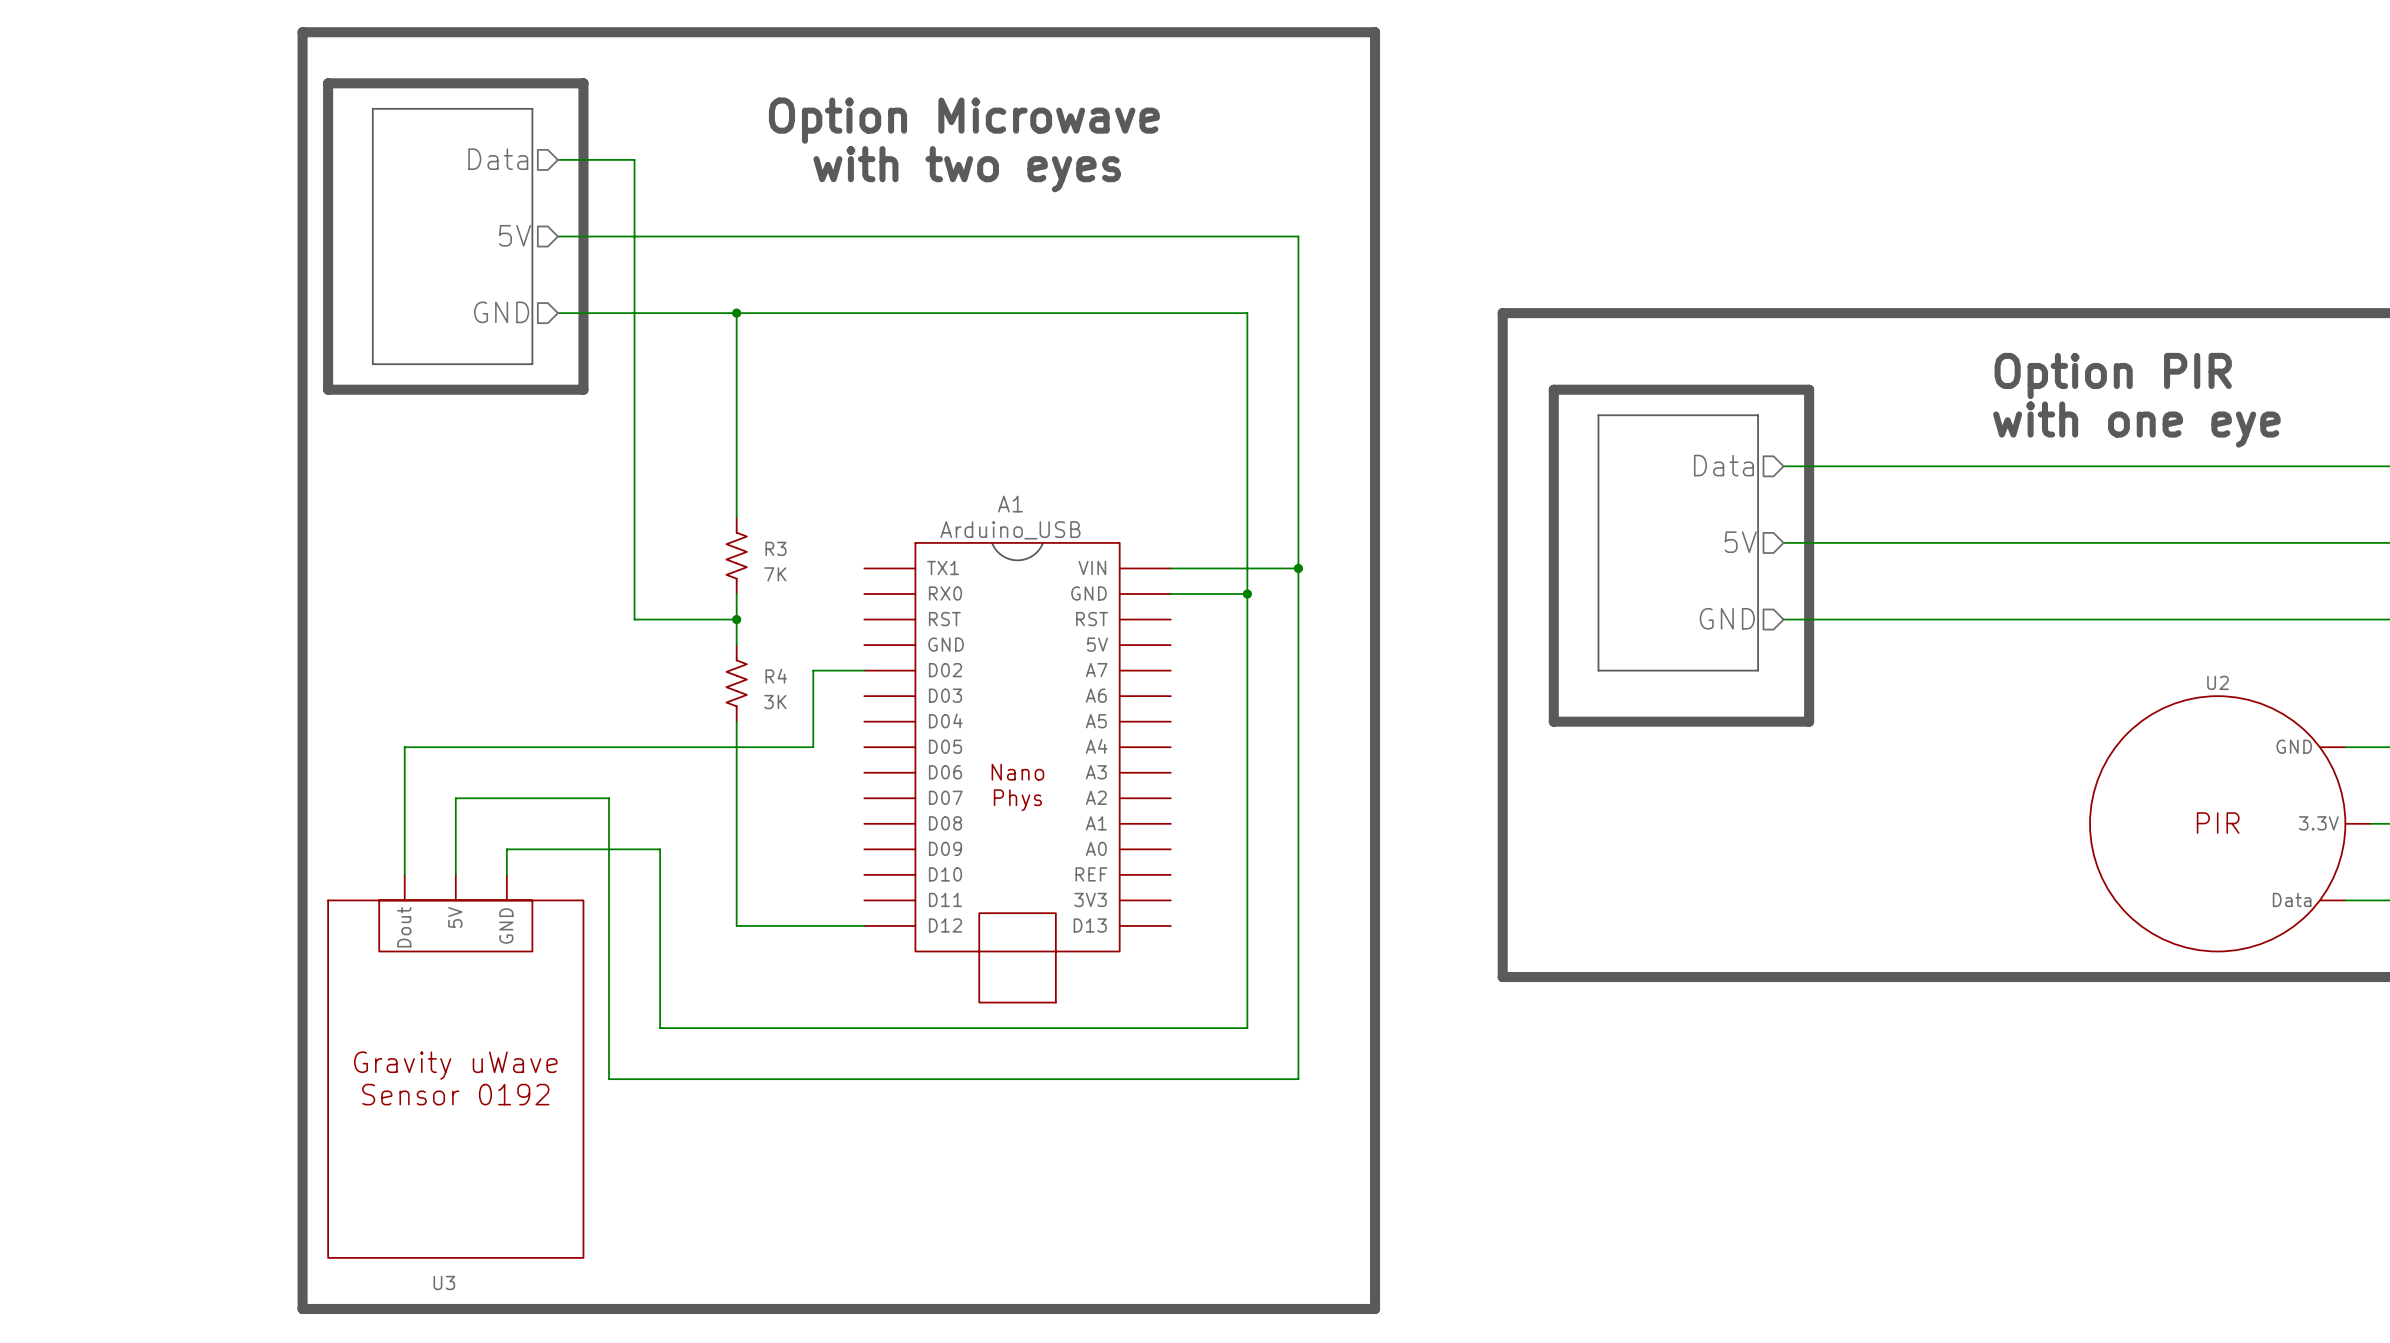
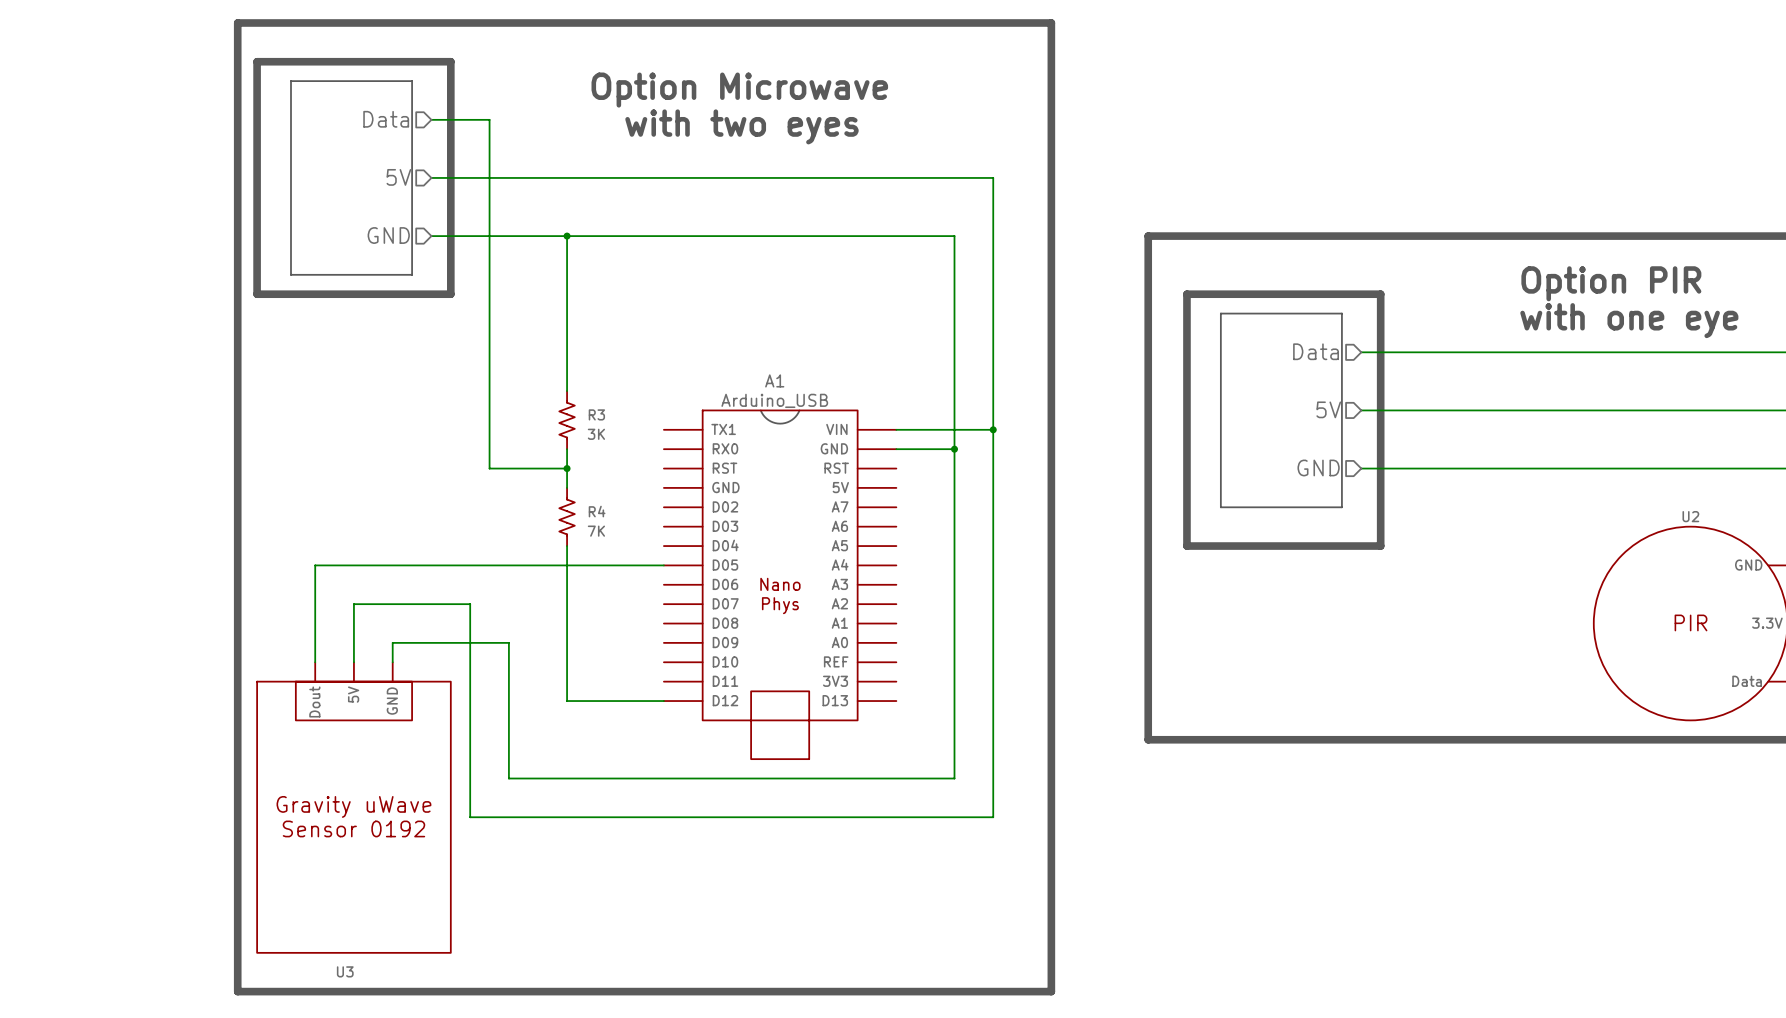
R3 value: 7K (775, 574) -> 3K (596, 434)
wire: (864, 670) (813, 670) (813, 747) -> (663, 565) (625, 565)
R4 value: 3K (775, 702) -> 7K (596, 531)

